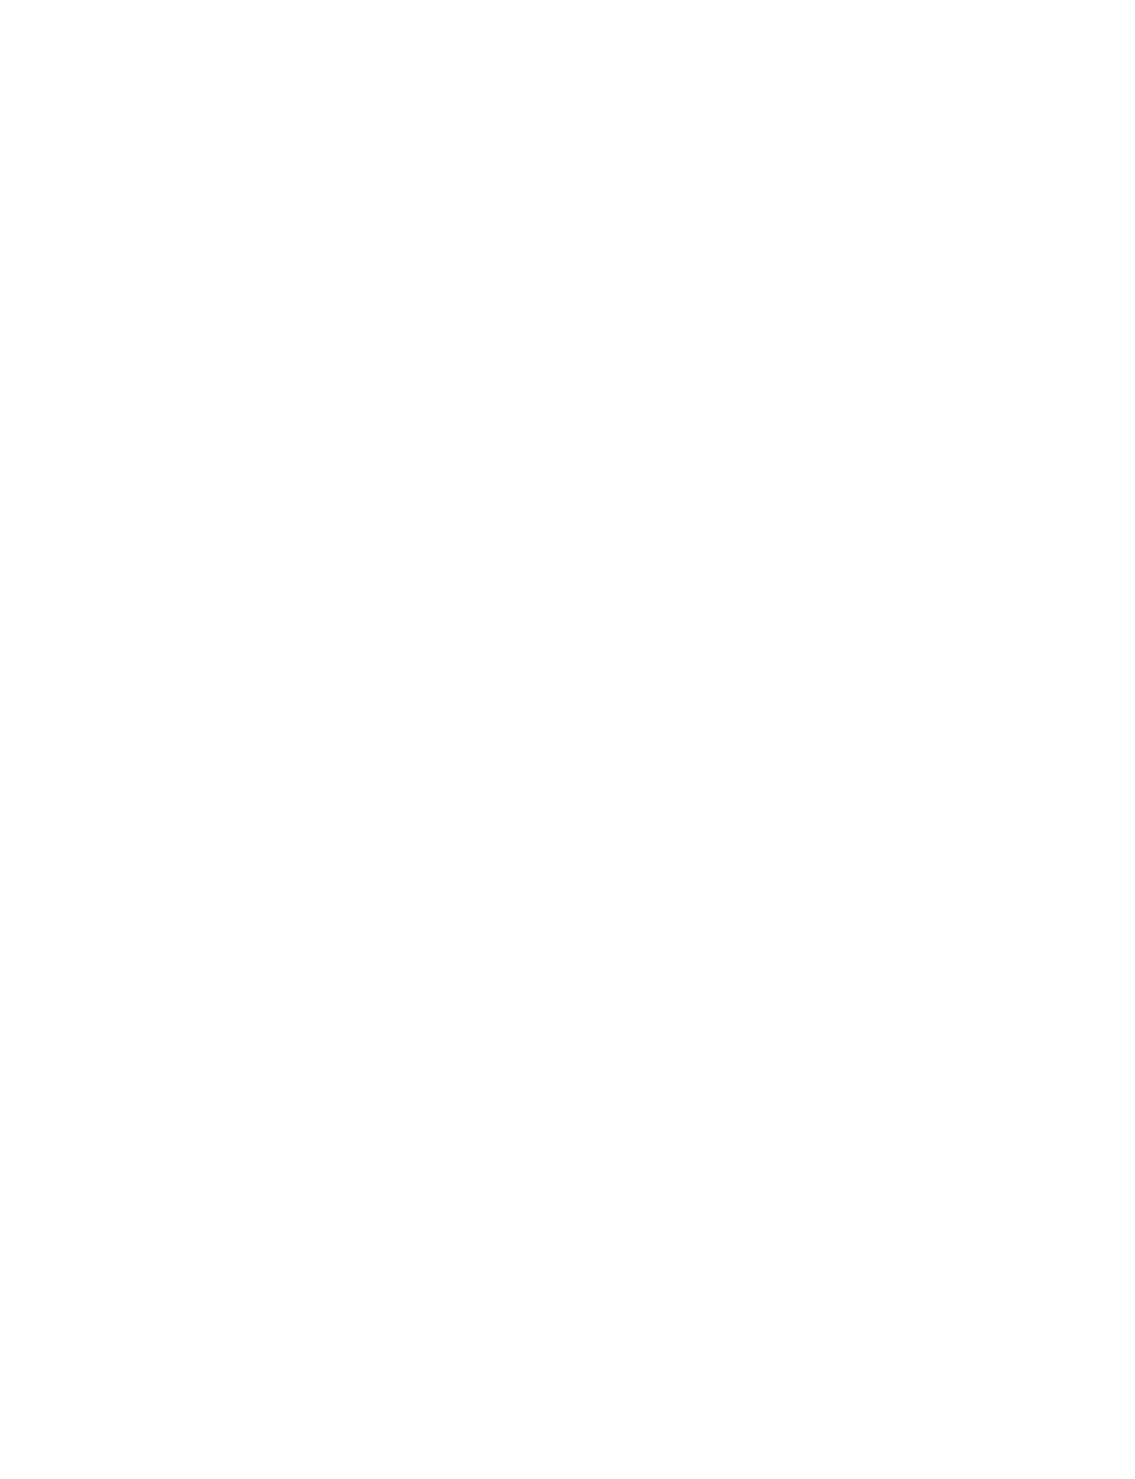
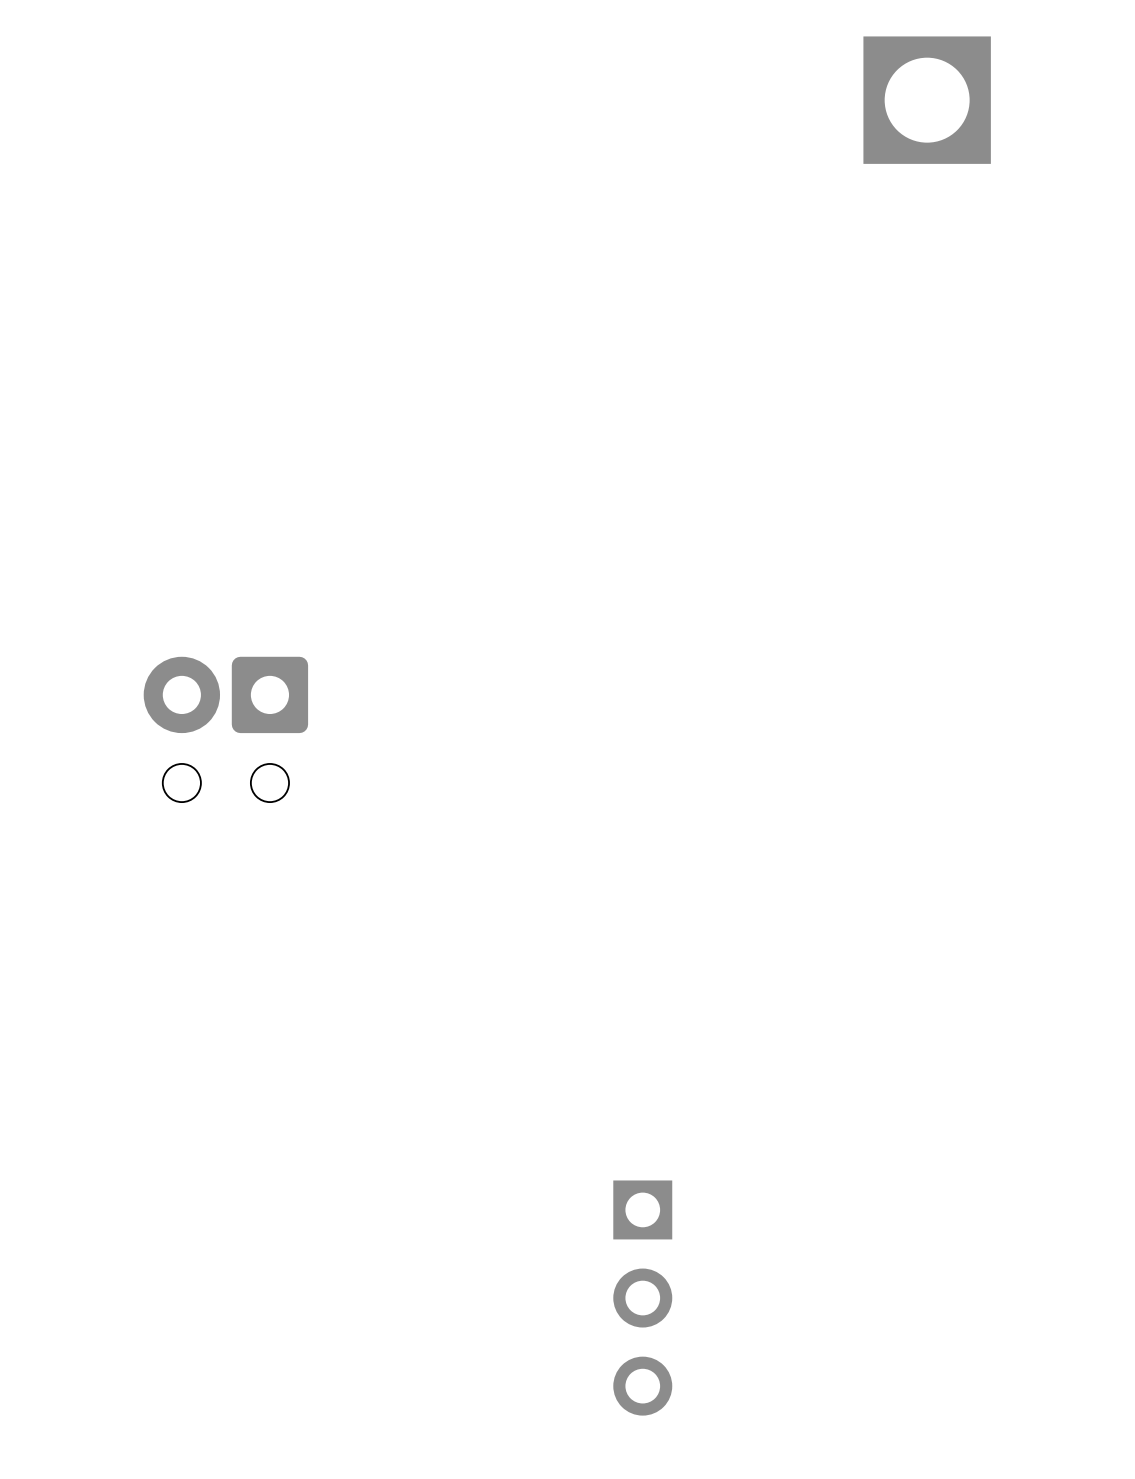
part: none -> (927, 100)
part: none -> (225, 729)
part: none -> (642, 1298)

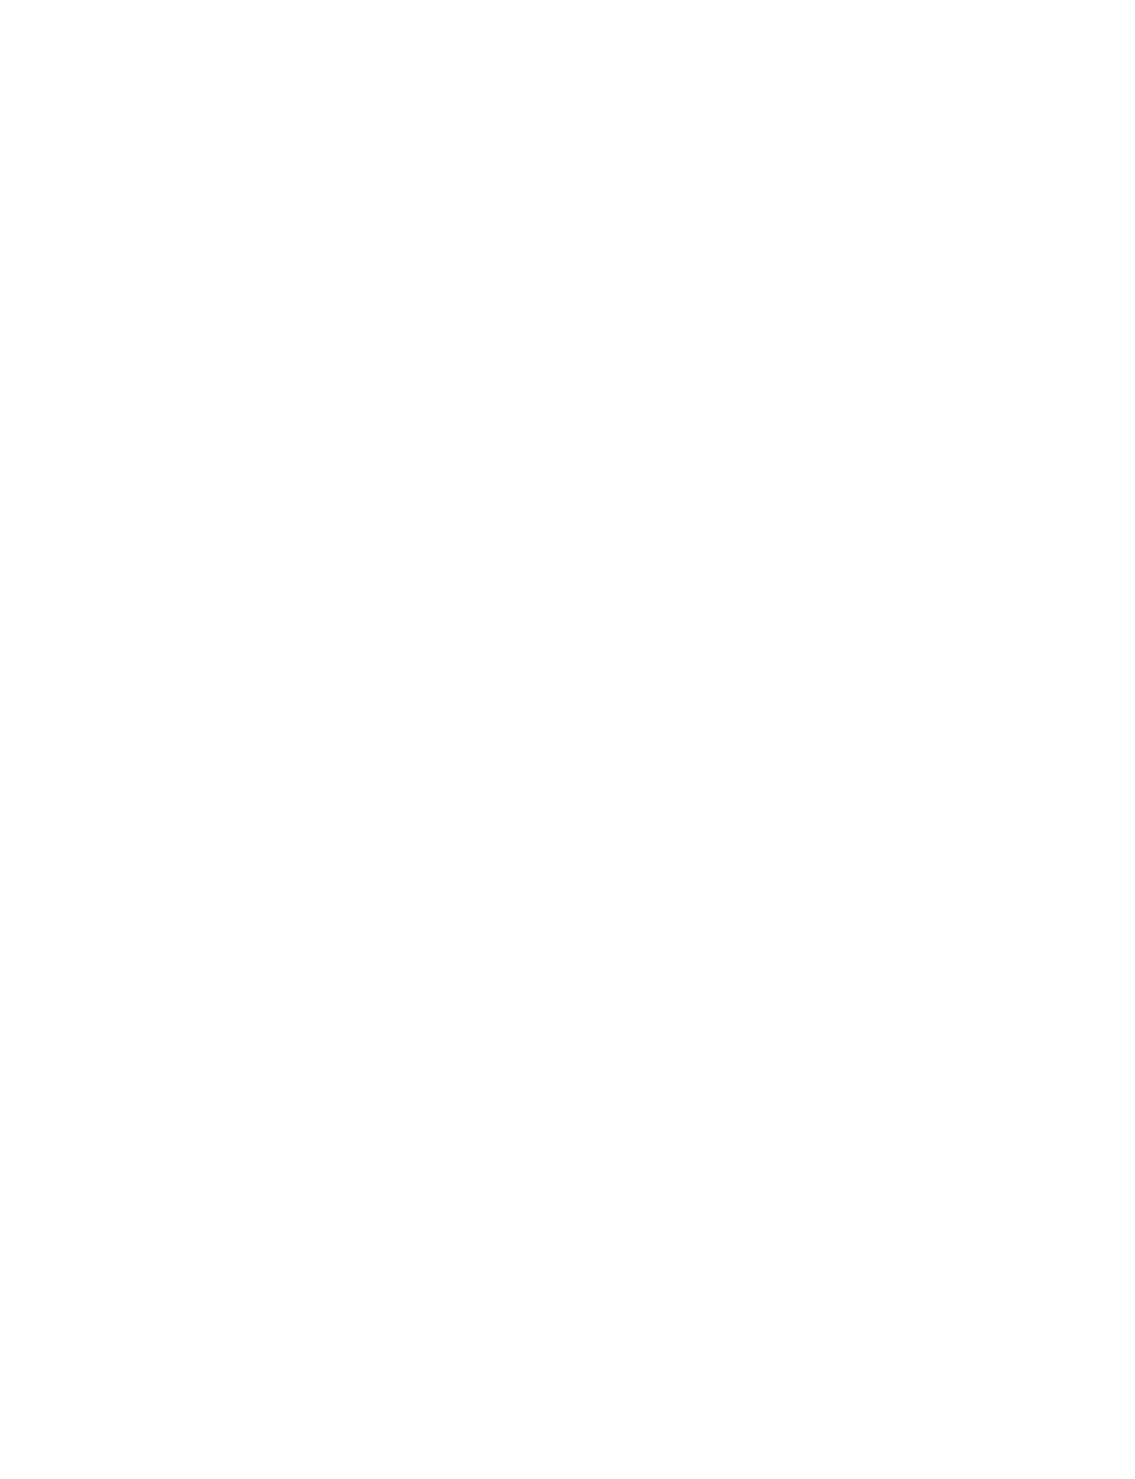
part: (927, 100) -> none
part: (225, 729) -> none
part: (642, 1298) -> none

